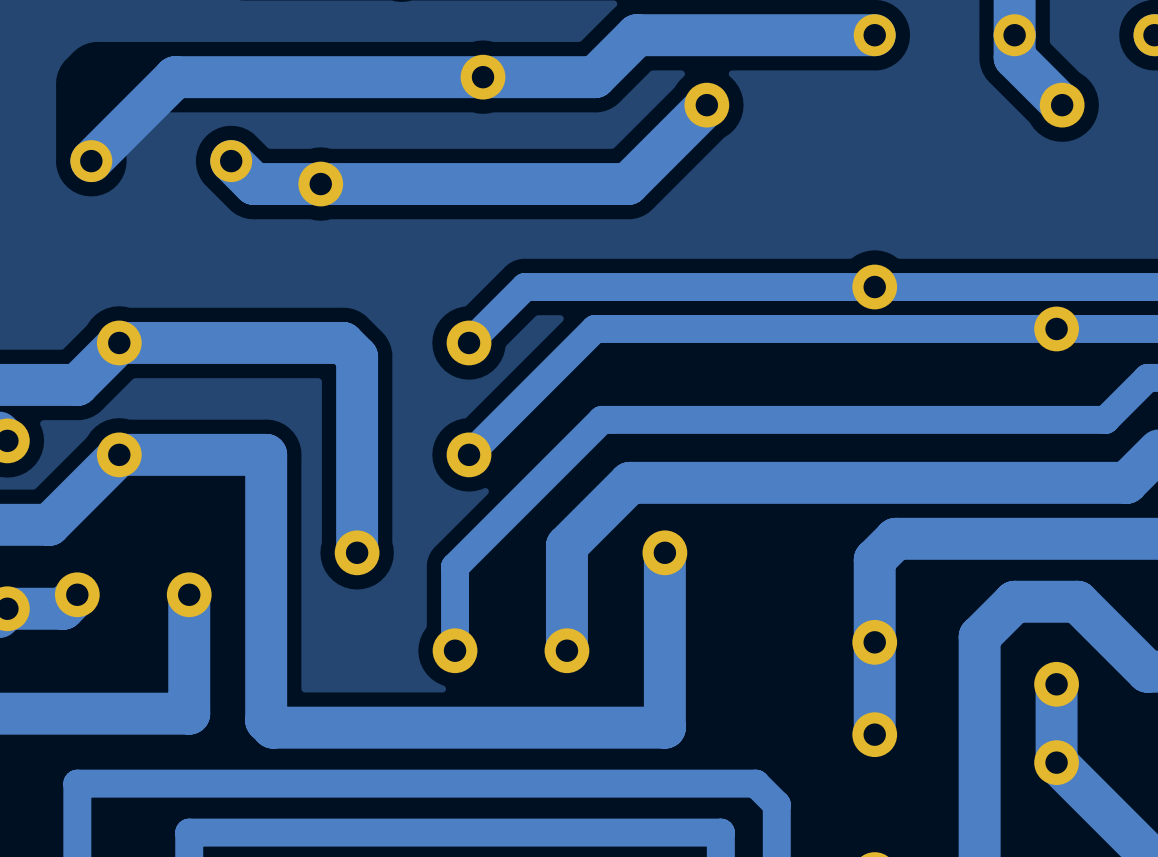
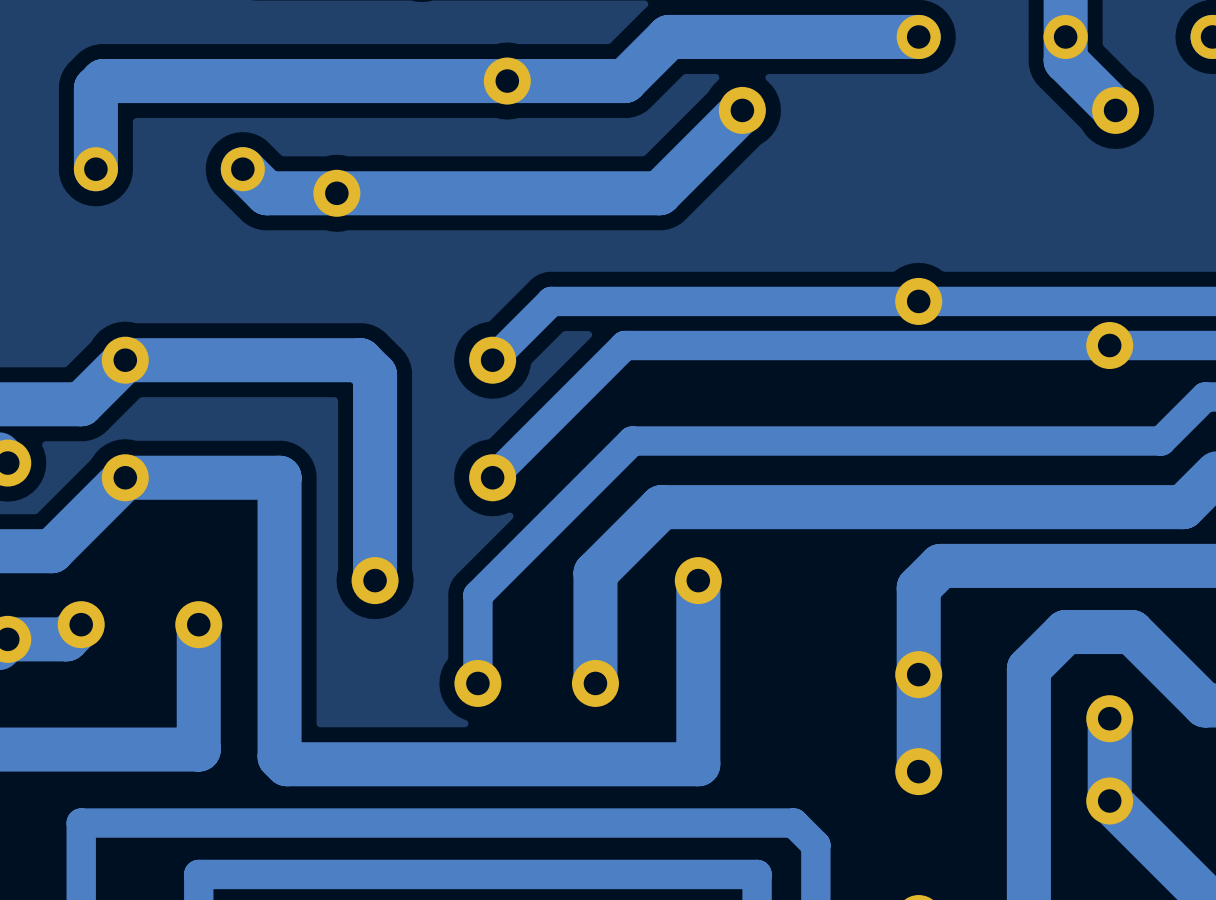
track: (175, 77) (91, 161) -> (184, 81) (103, 81) (95, 88) (95, 169)

